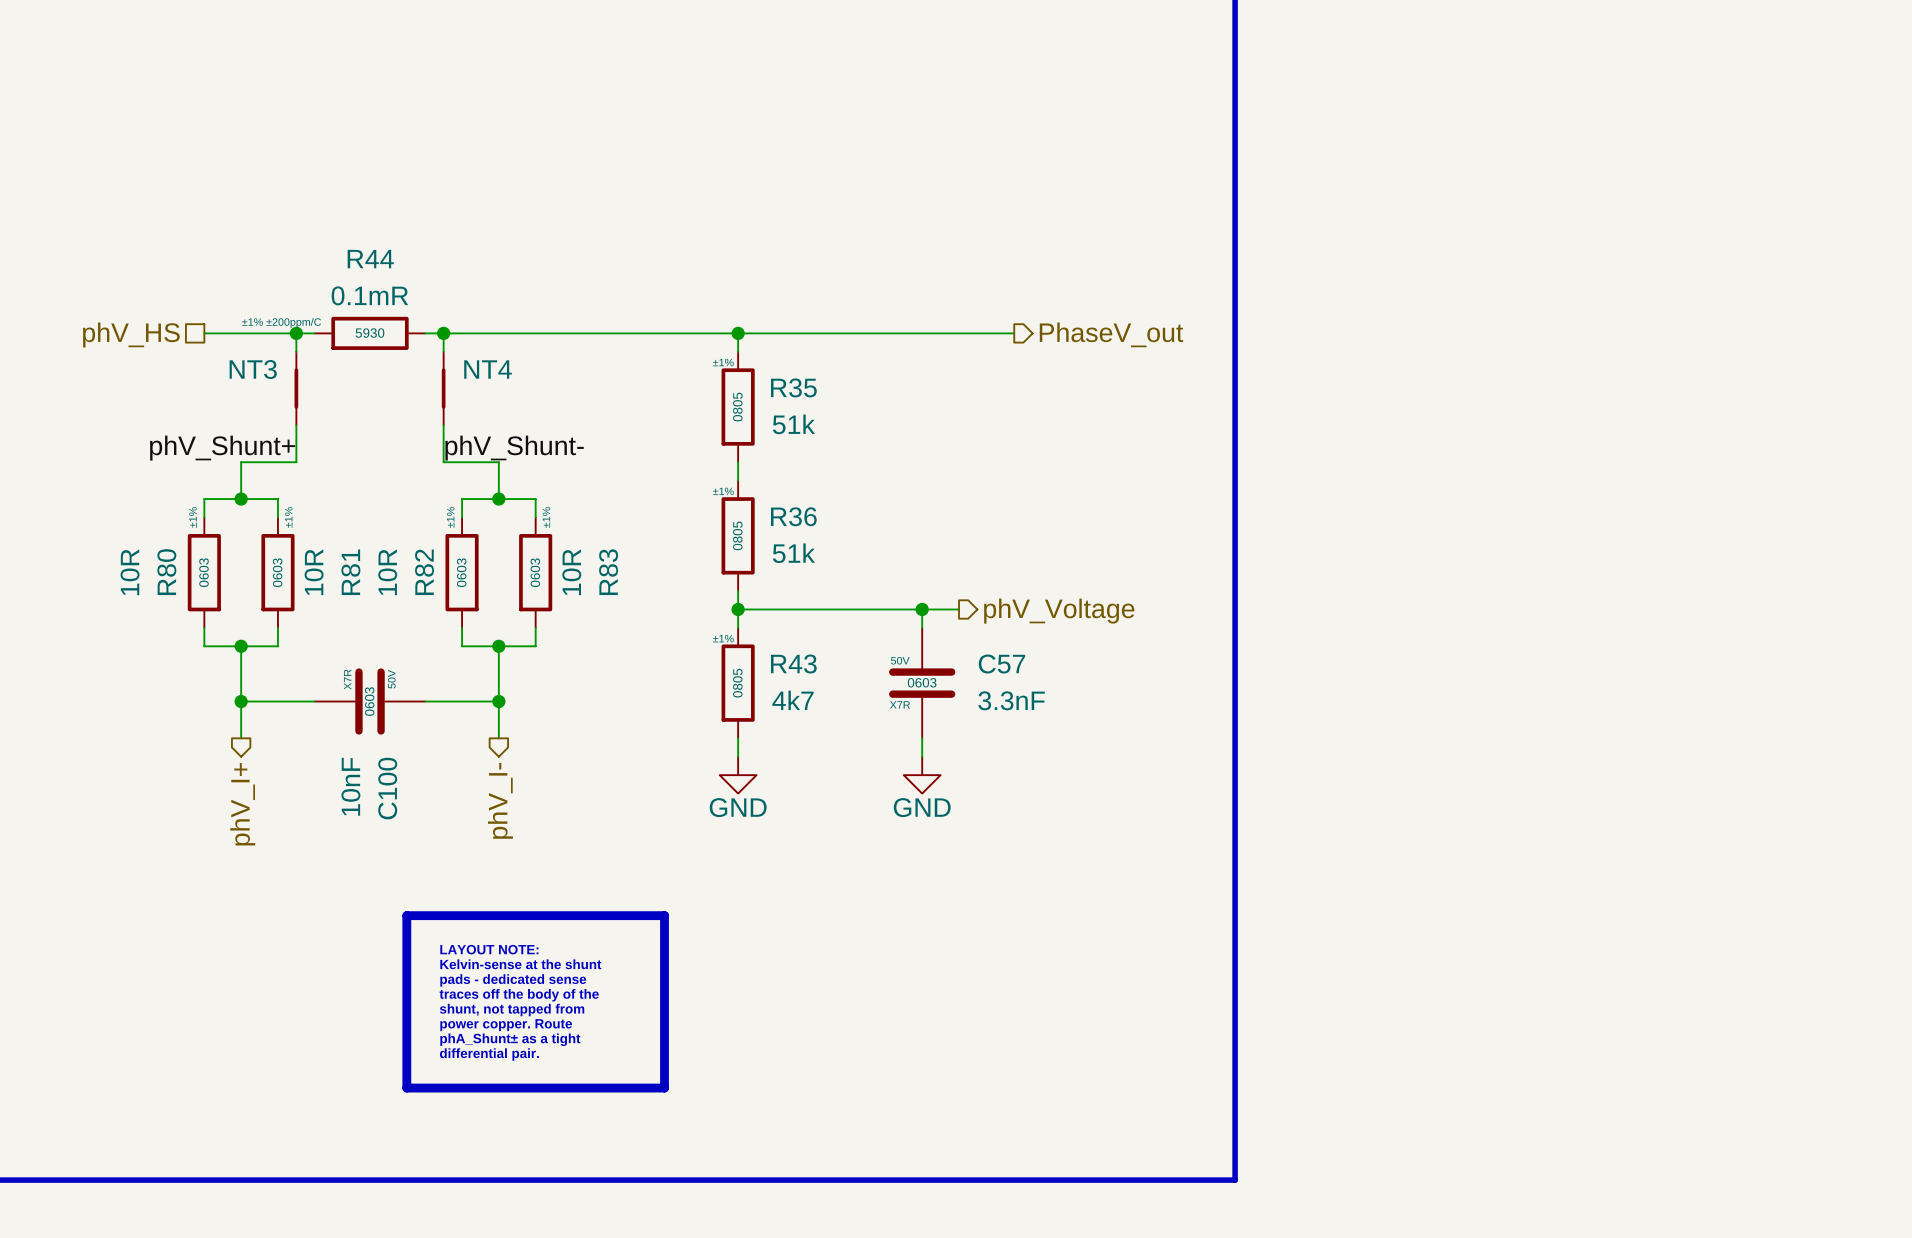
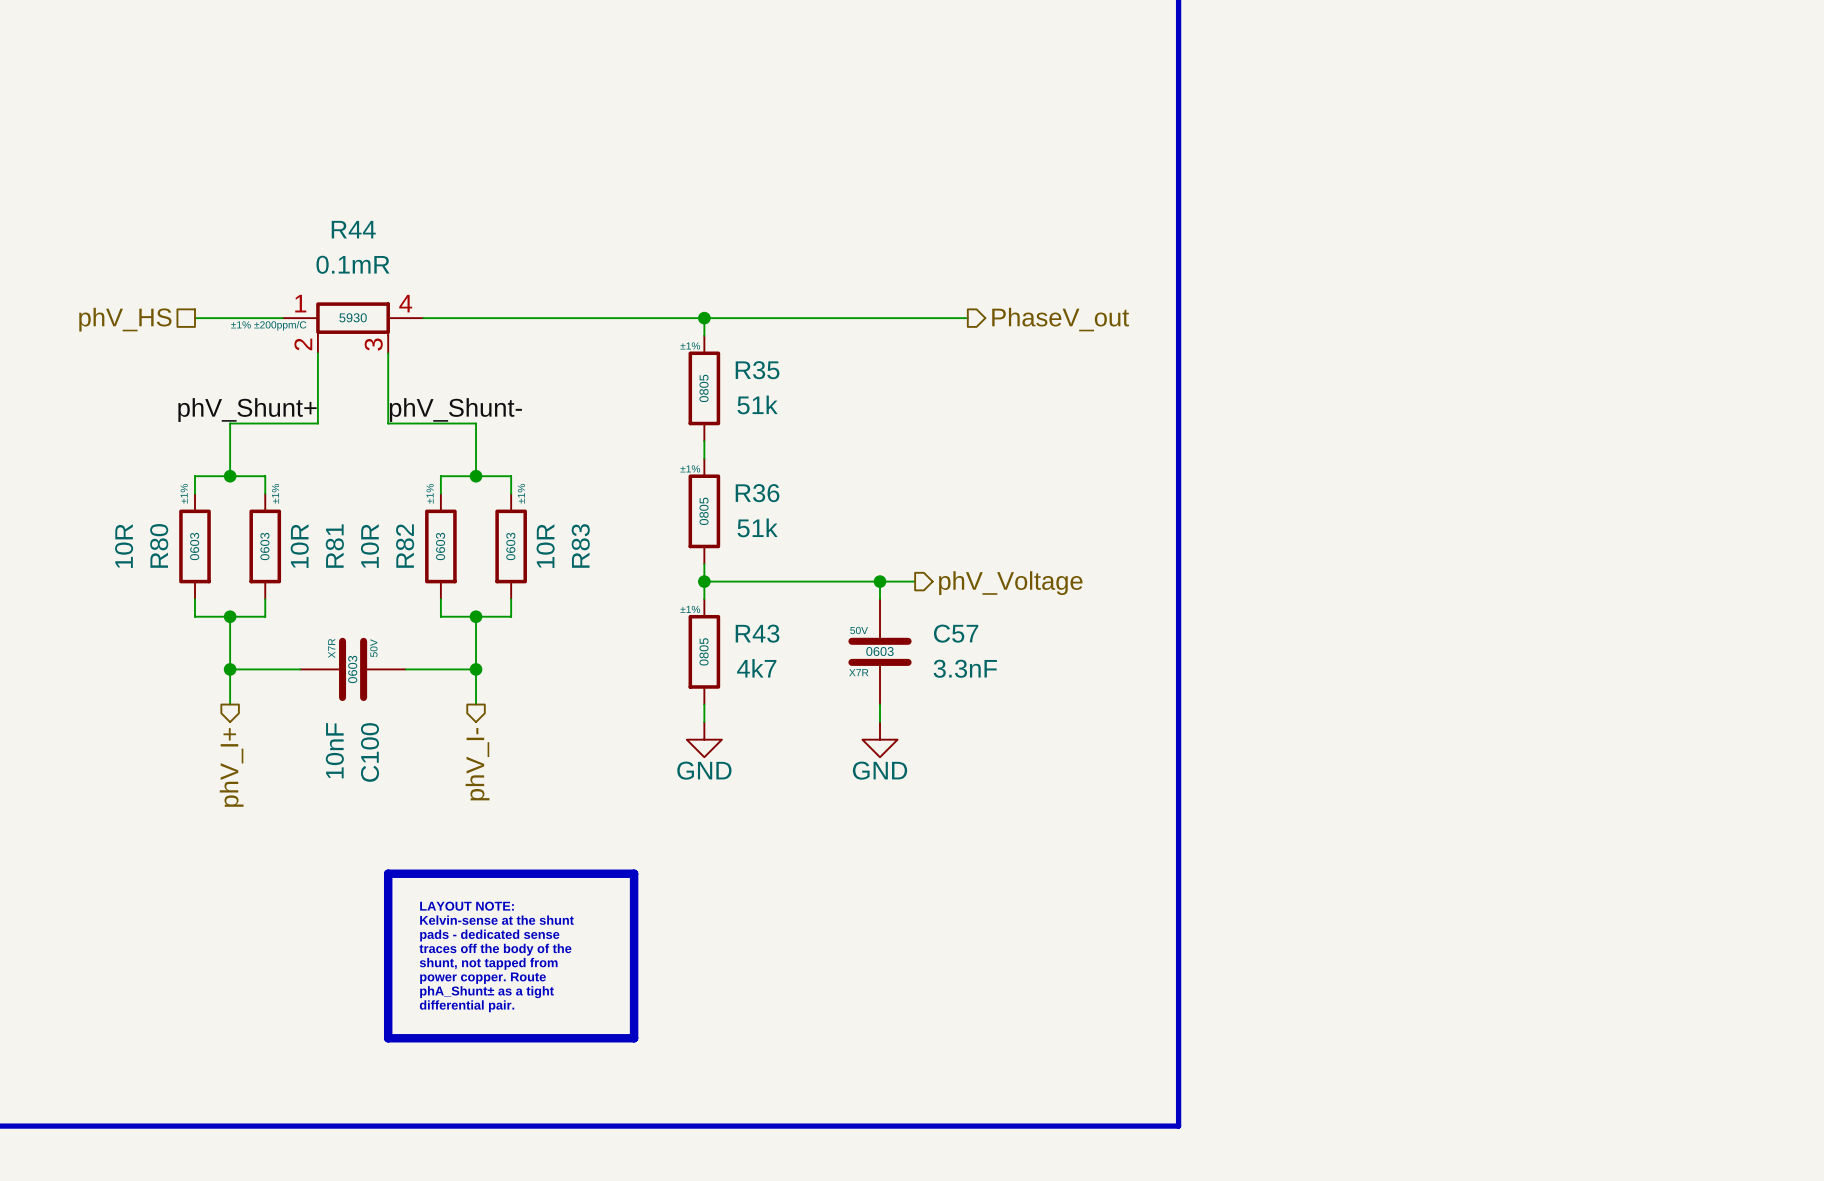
R44 symbol: [314, 316, 426, 350] -> [282, 302, 424, 354]
junction: (296, 333) -> none
wire: (425, 333) (443, 333) (443, 351) -> none
junction: (443, 333) -> none
NT3: (296, 388) -> none
NT4: (443, 388) -> none
wire: (296, 425) (296, 462) (241, 462) -> (317, 353) (317, 423) (230, 423) (230, 441)
wire: (443, 425) (443, 462) (498, 462) -> (388, 353) (388, 423) (476, 423) (476, 441)
label position: phV_Shunt+ (222, 448) -> phV_Shunt+ (247, 410)
label position: phV_Shunt- (514, 448) -> phV_Shunt- (455, 410)

